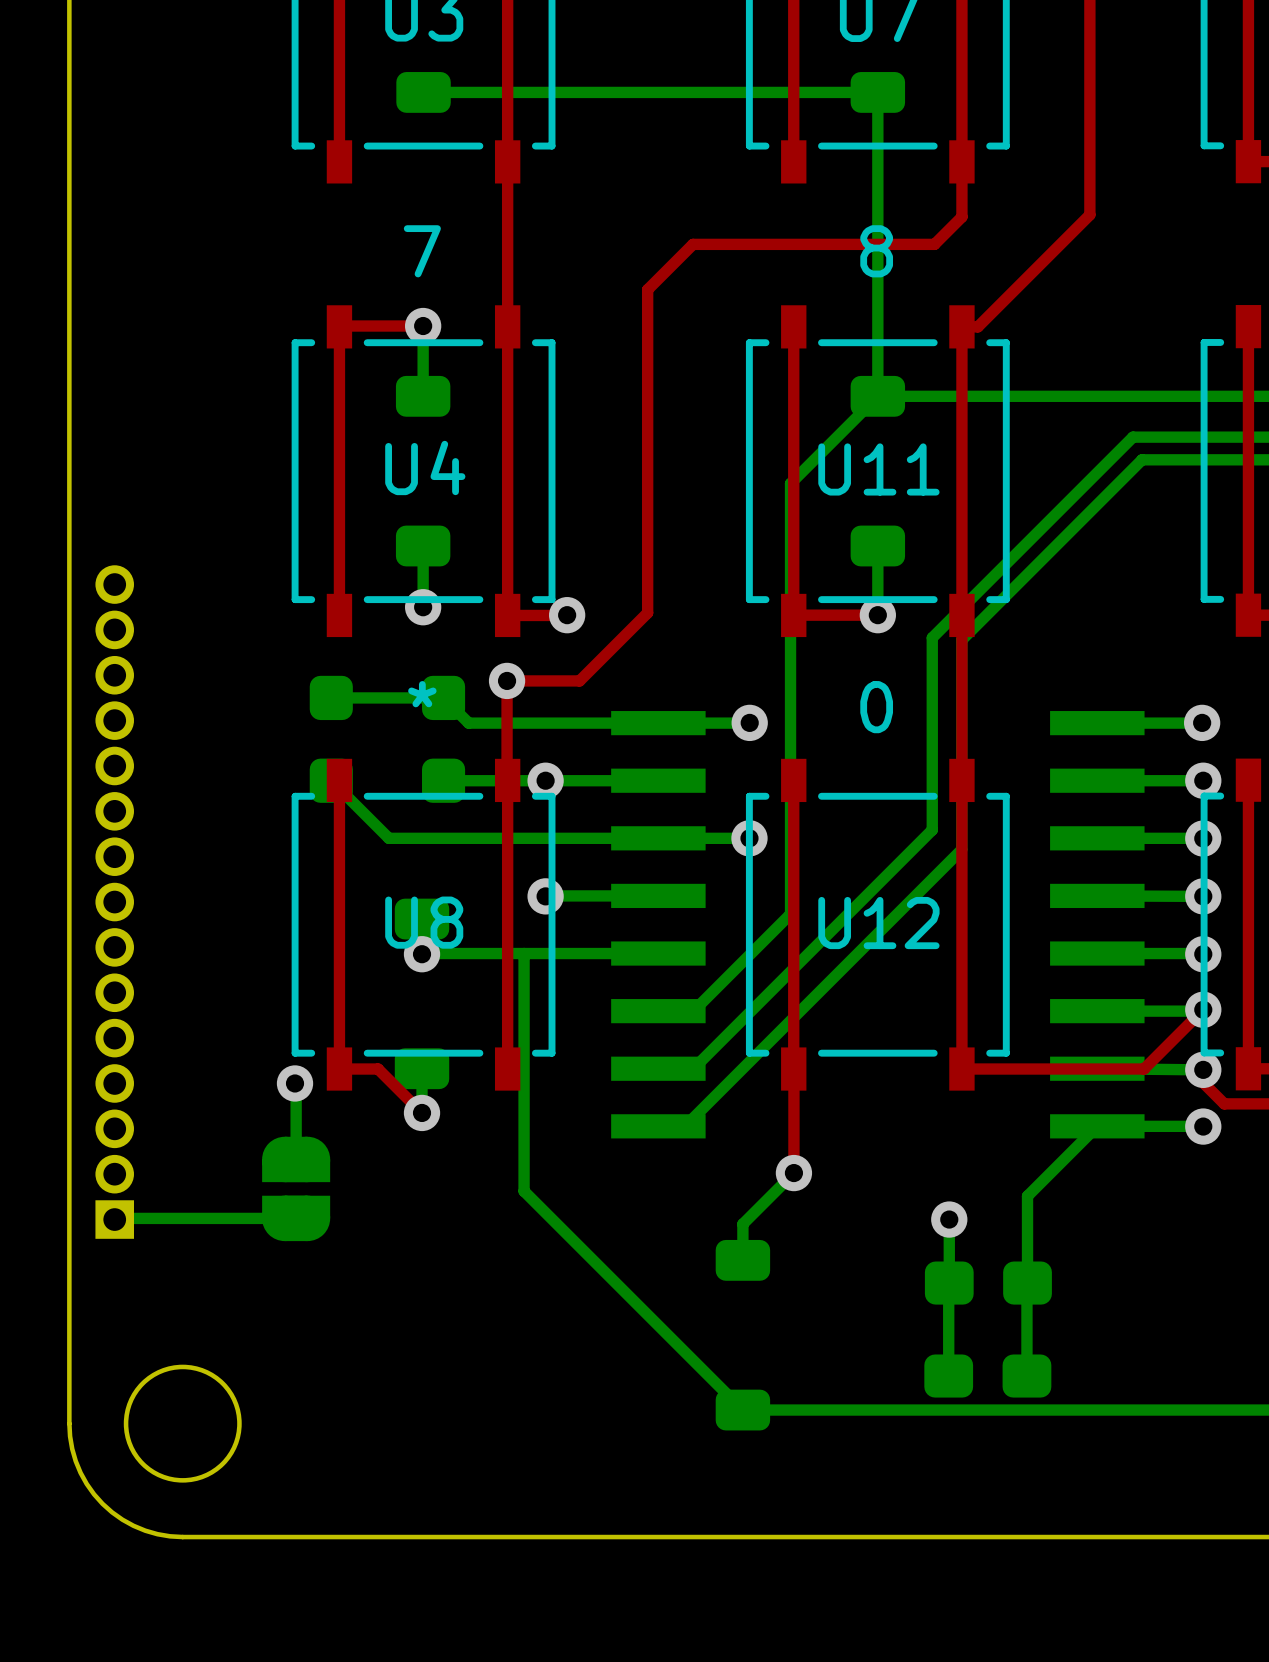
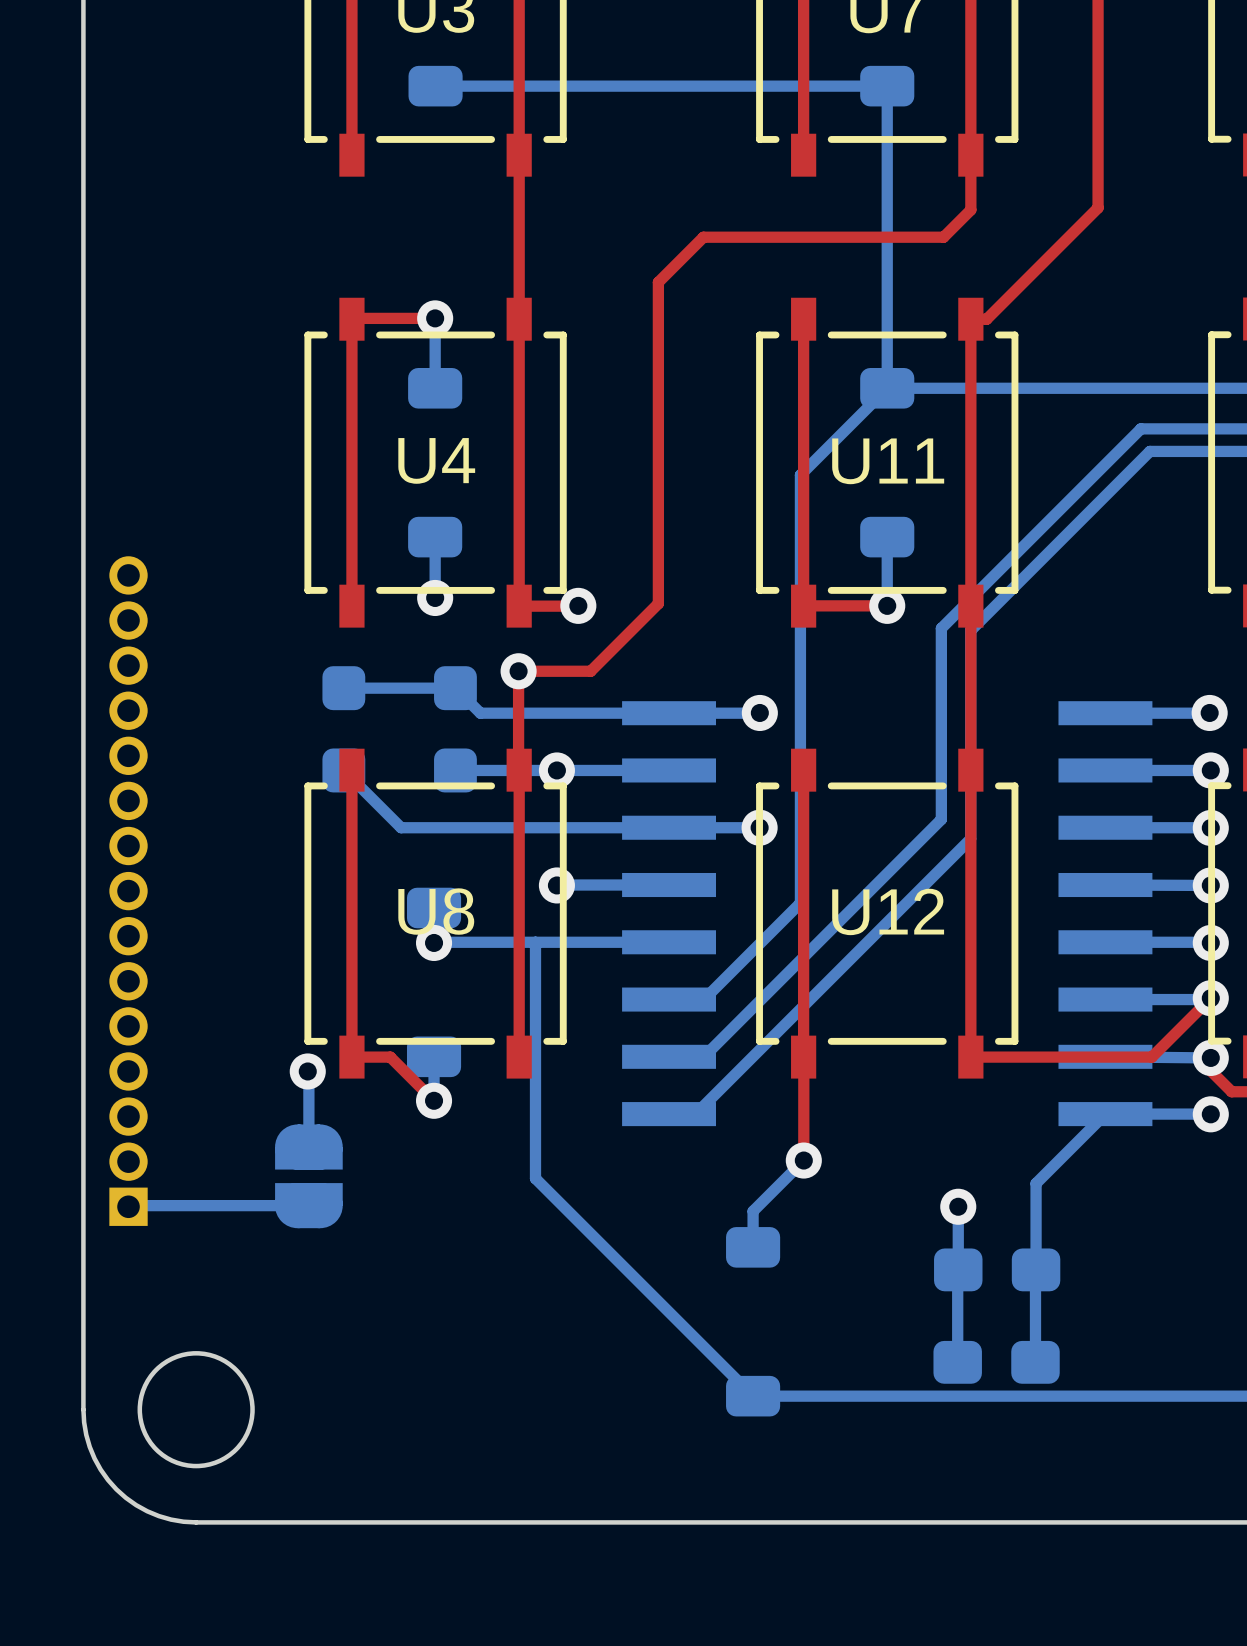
text: 7 (422, 251) -> none
text: 8 (876, 251) -> none
text: * (422, 694) -> none
text: 0 (876, 707) -> none

